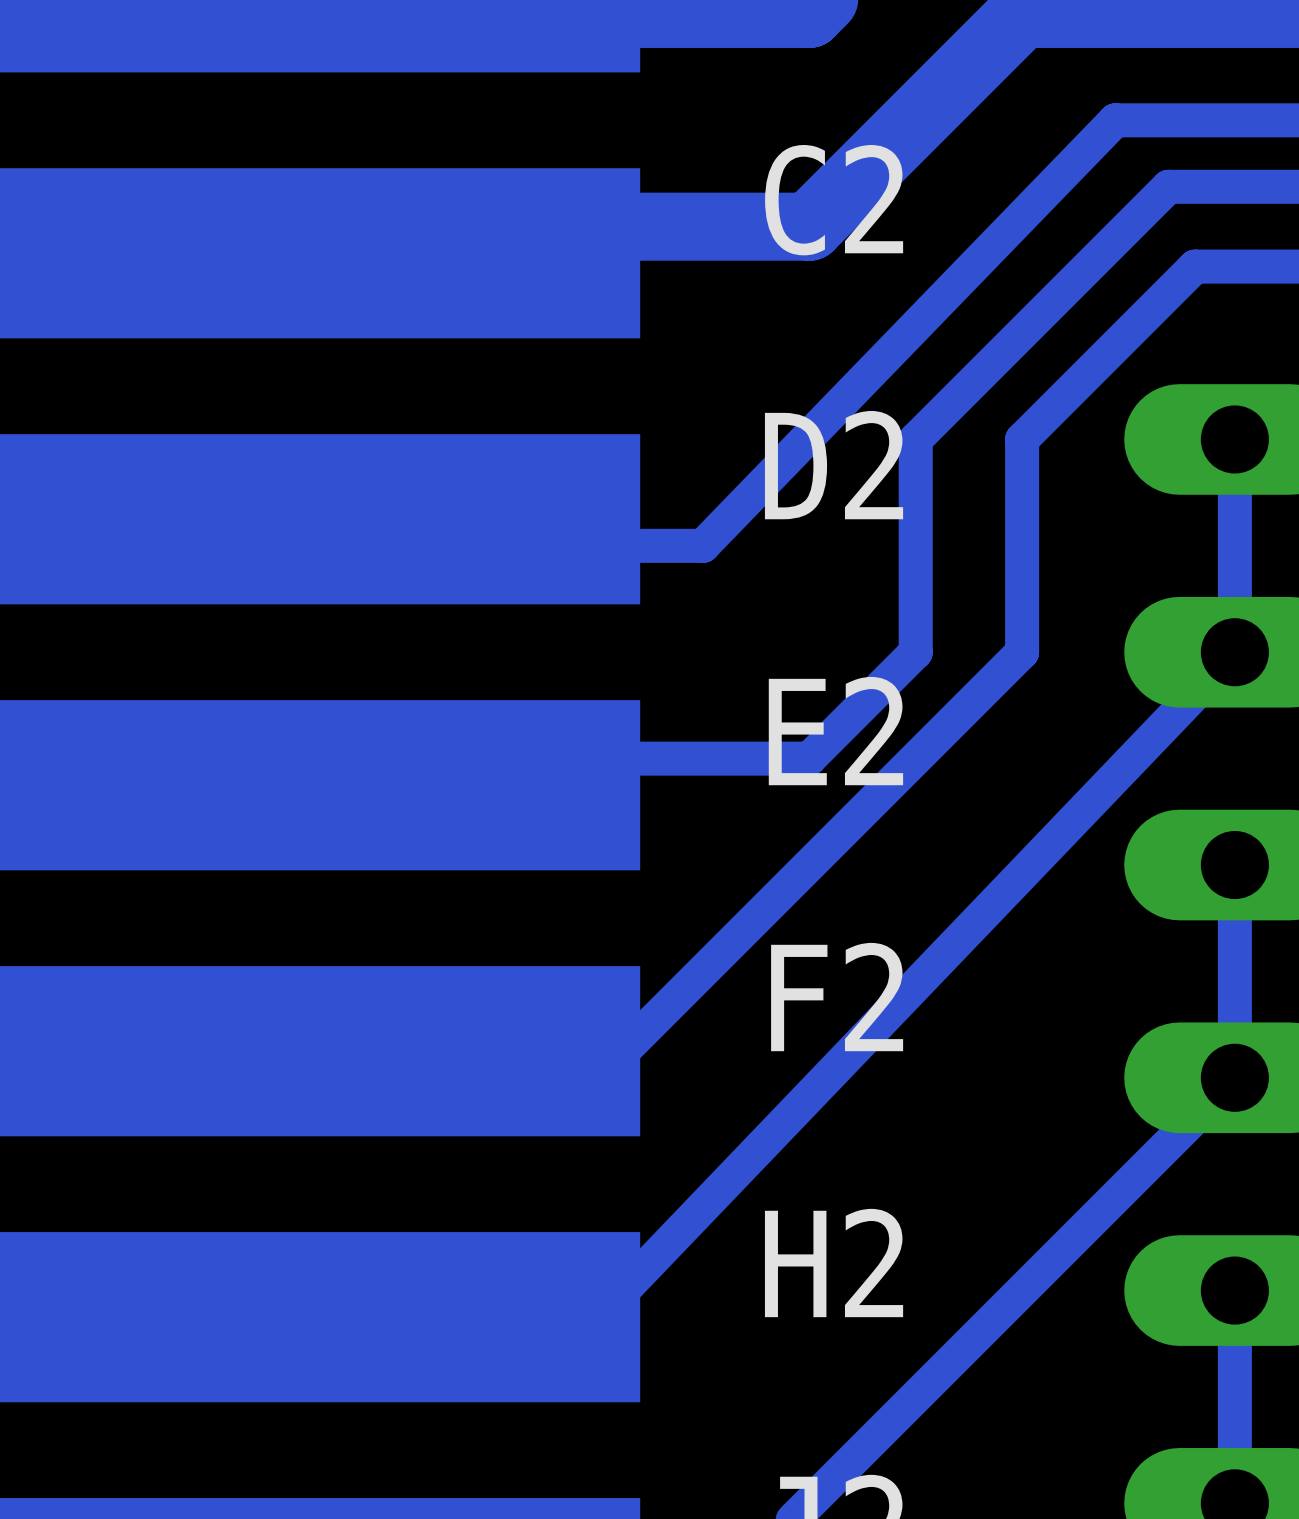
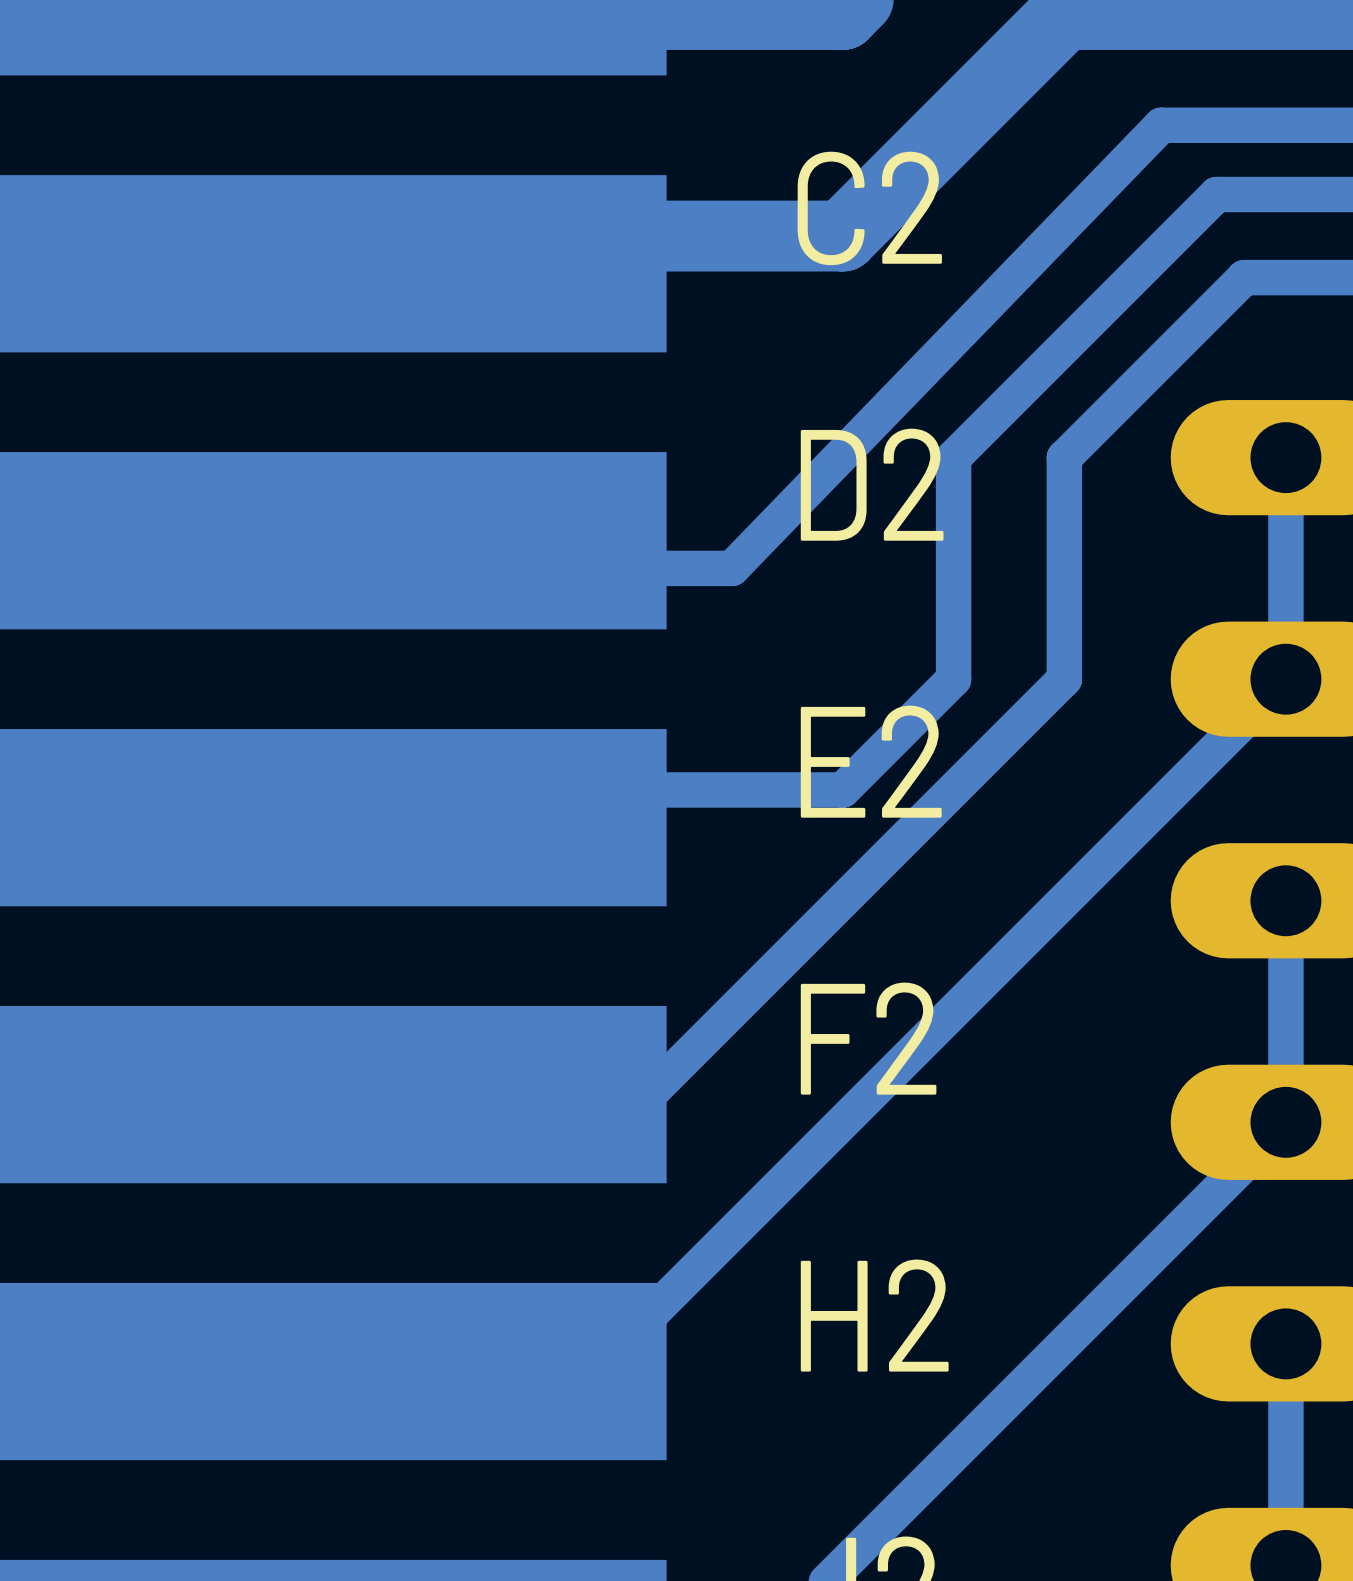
track: (1234, 652) (623, 1290) (596, 1290) -> (1285, 679) (621, 1343)

